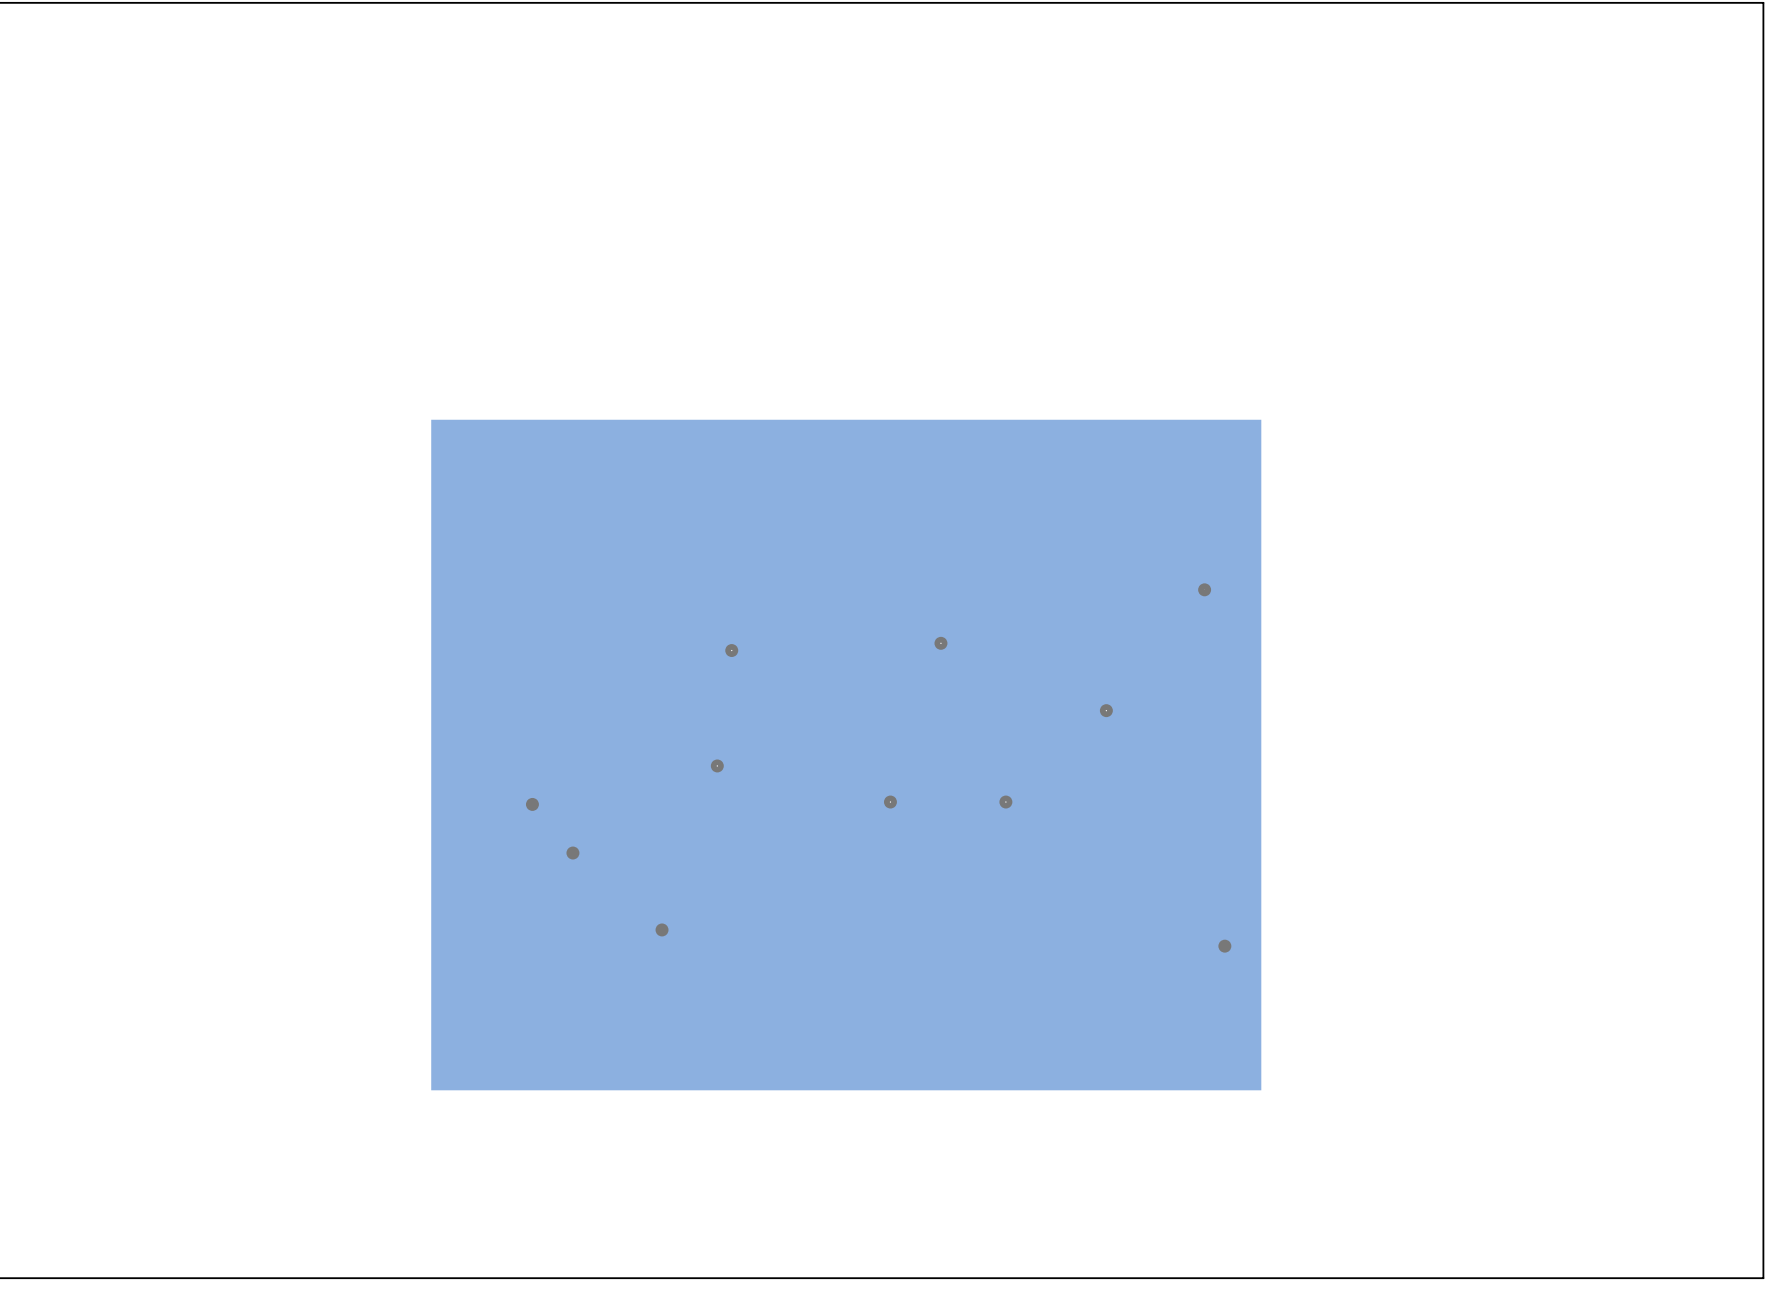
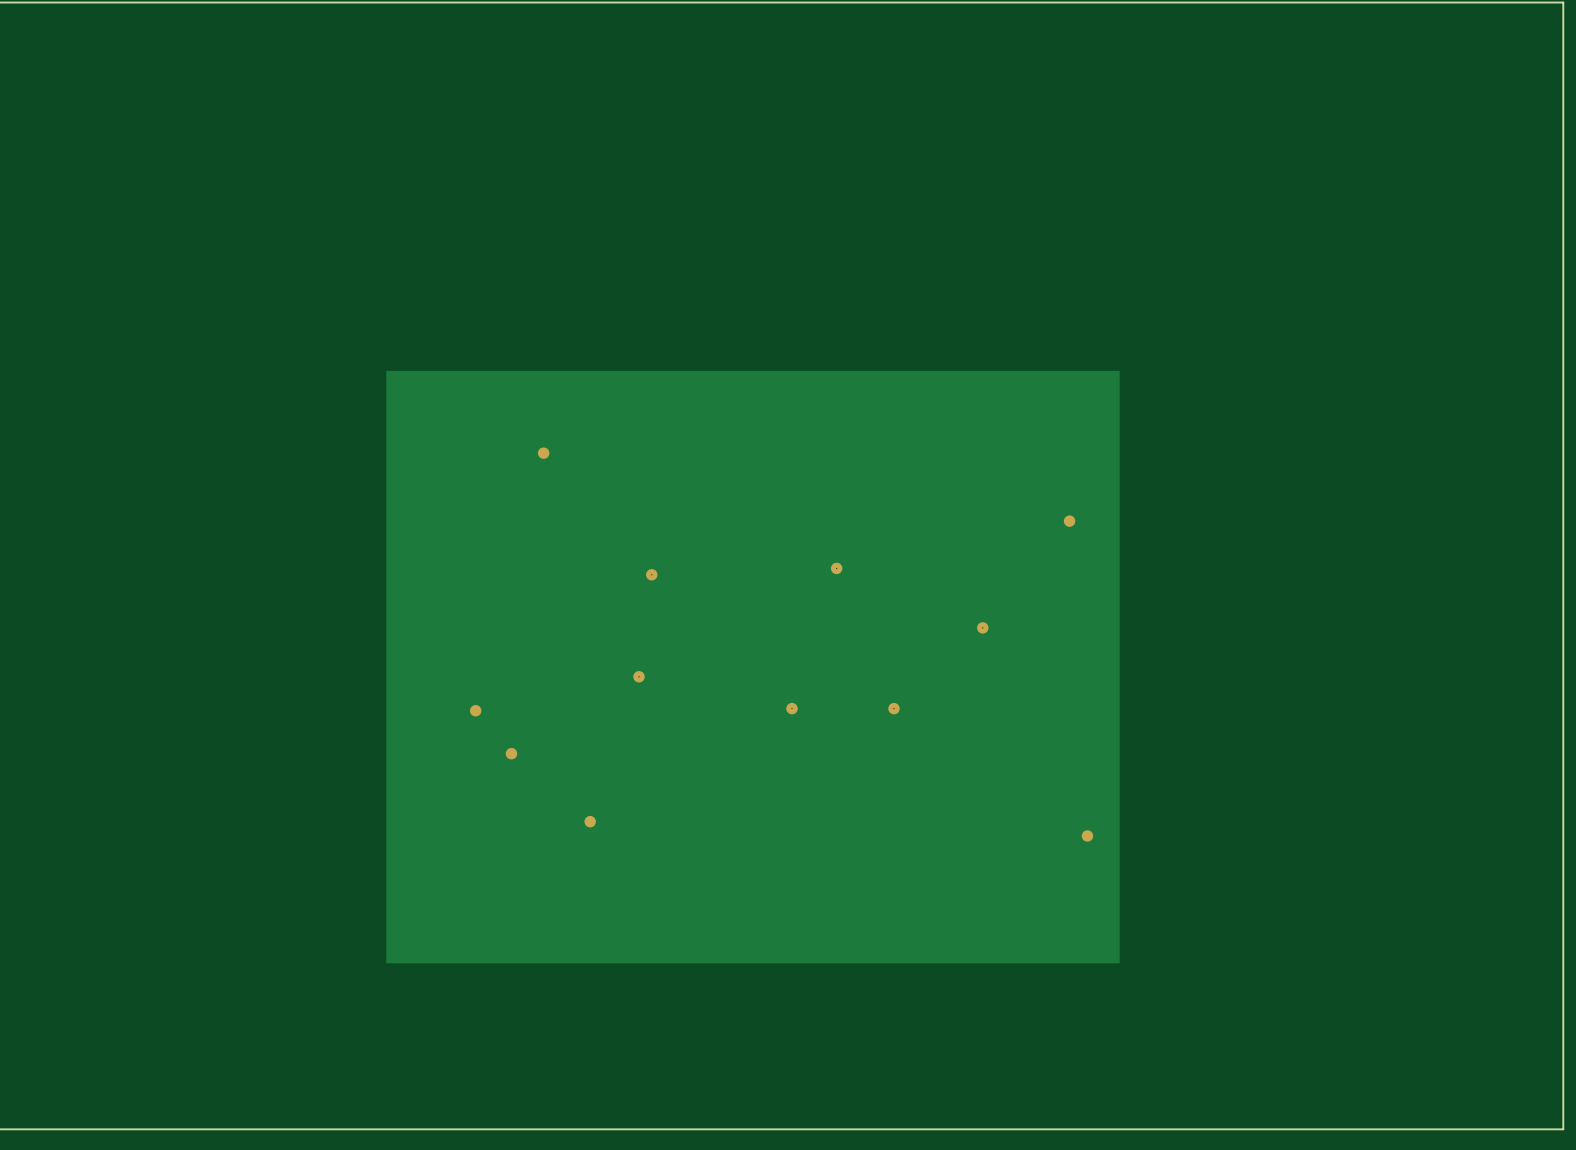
via: none -> (543, 453)

